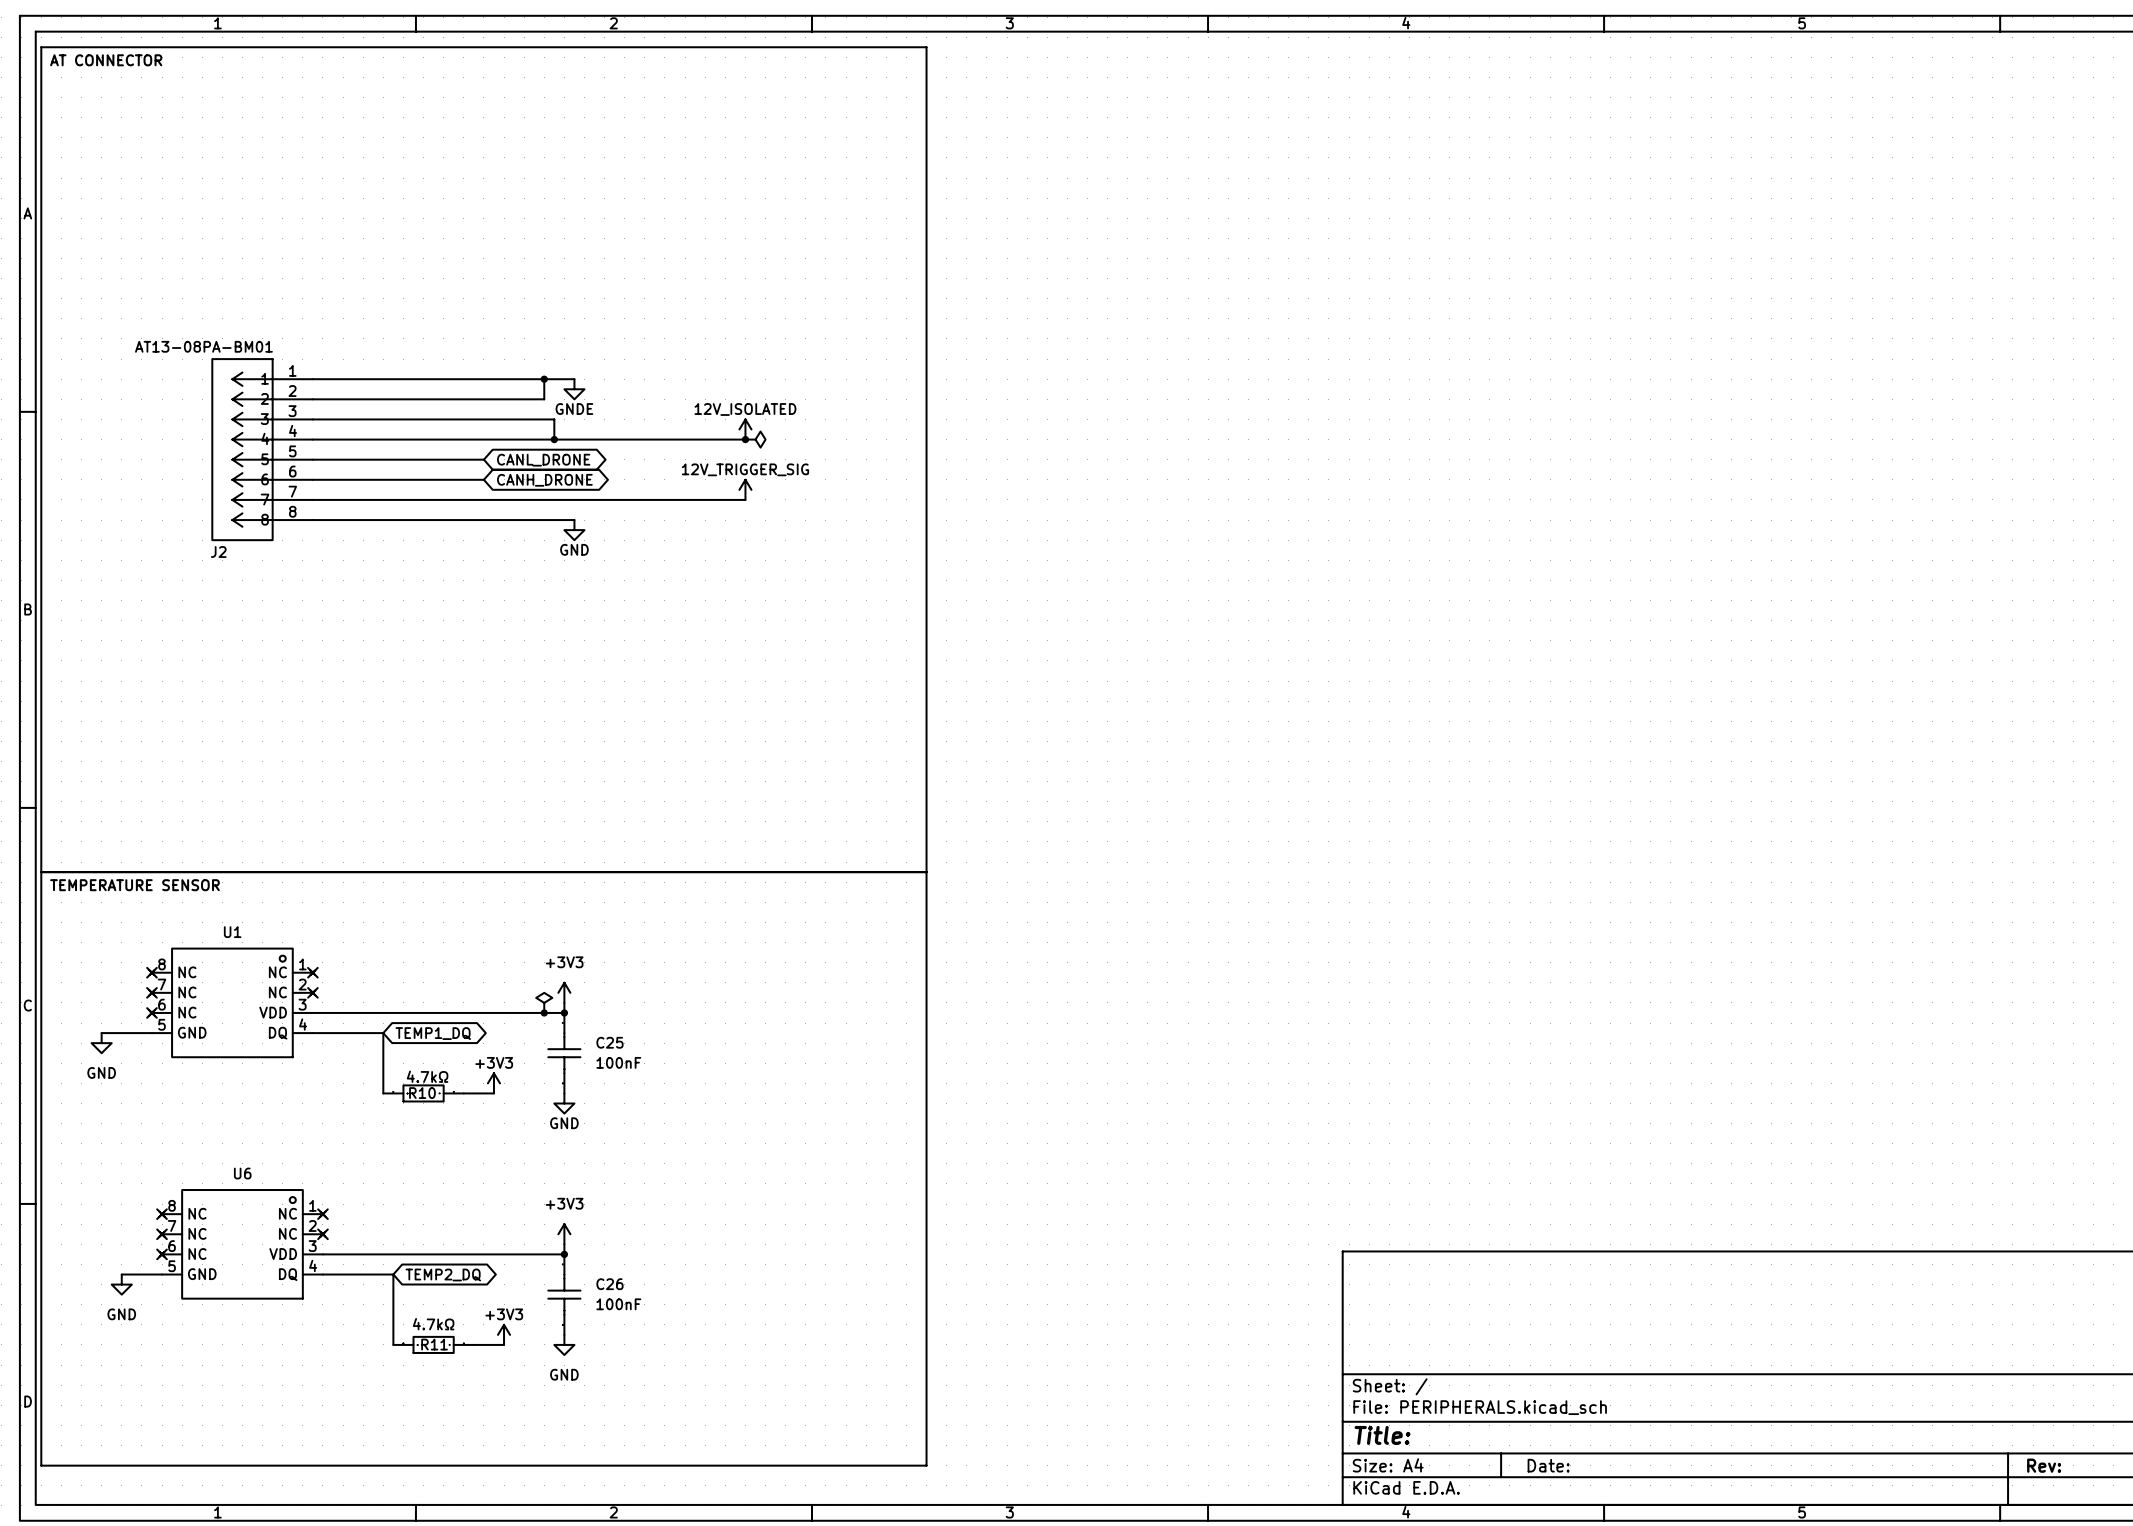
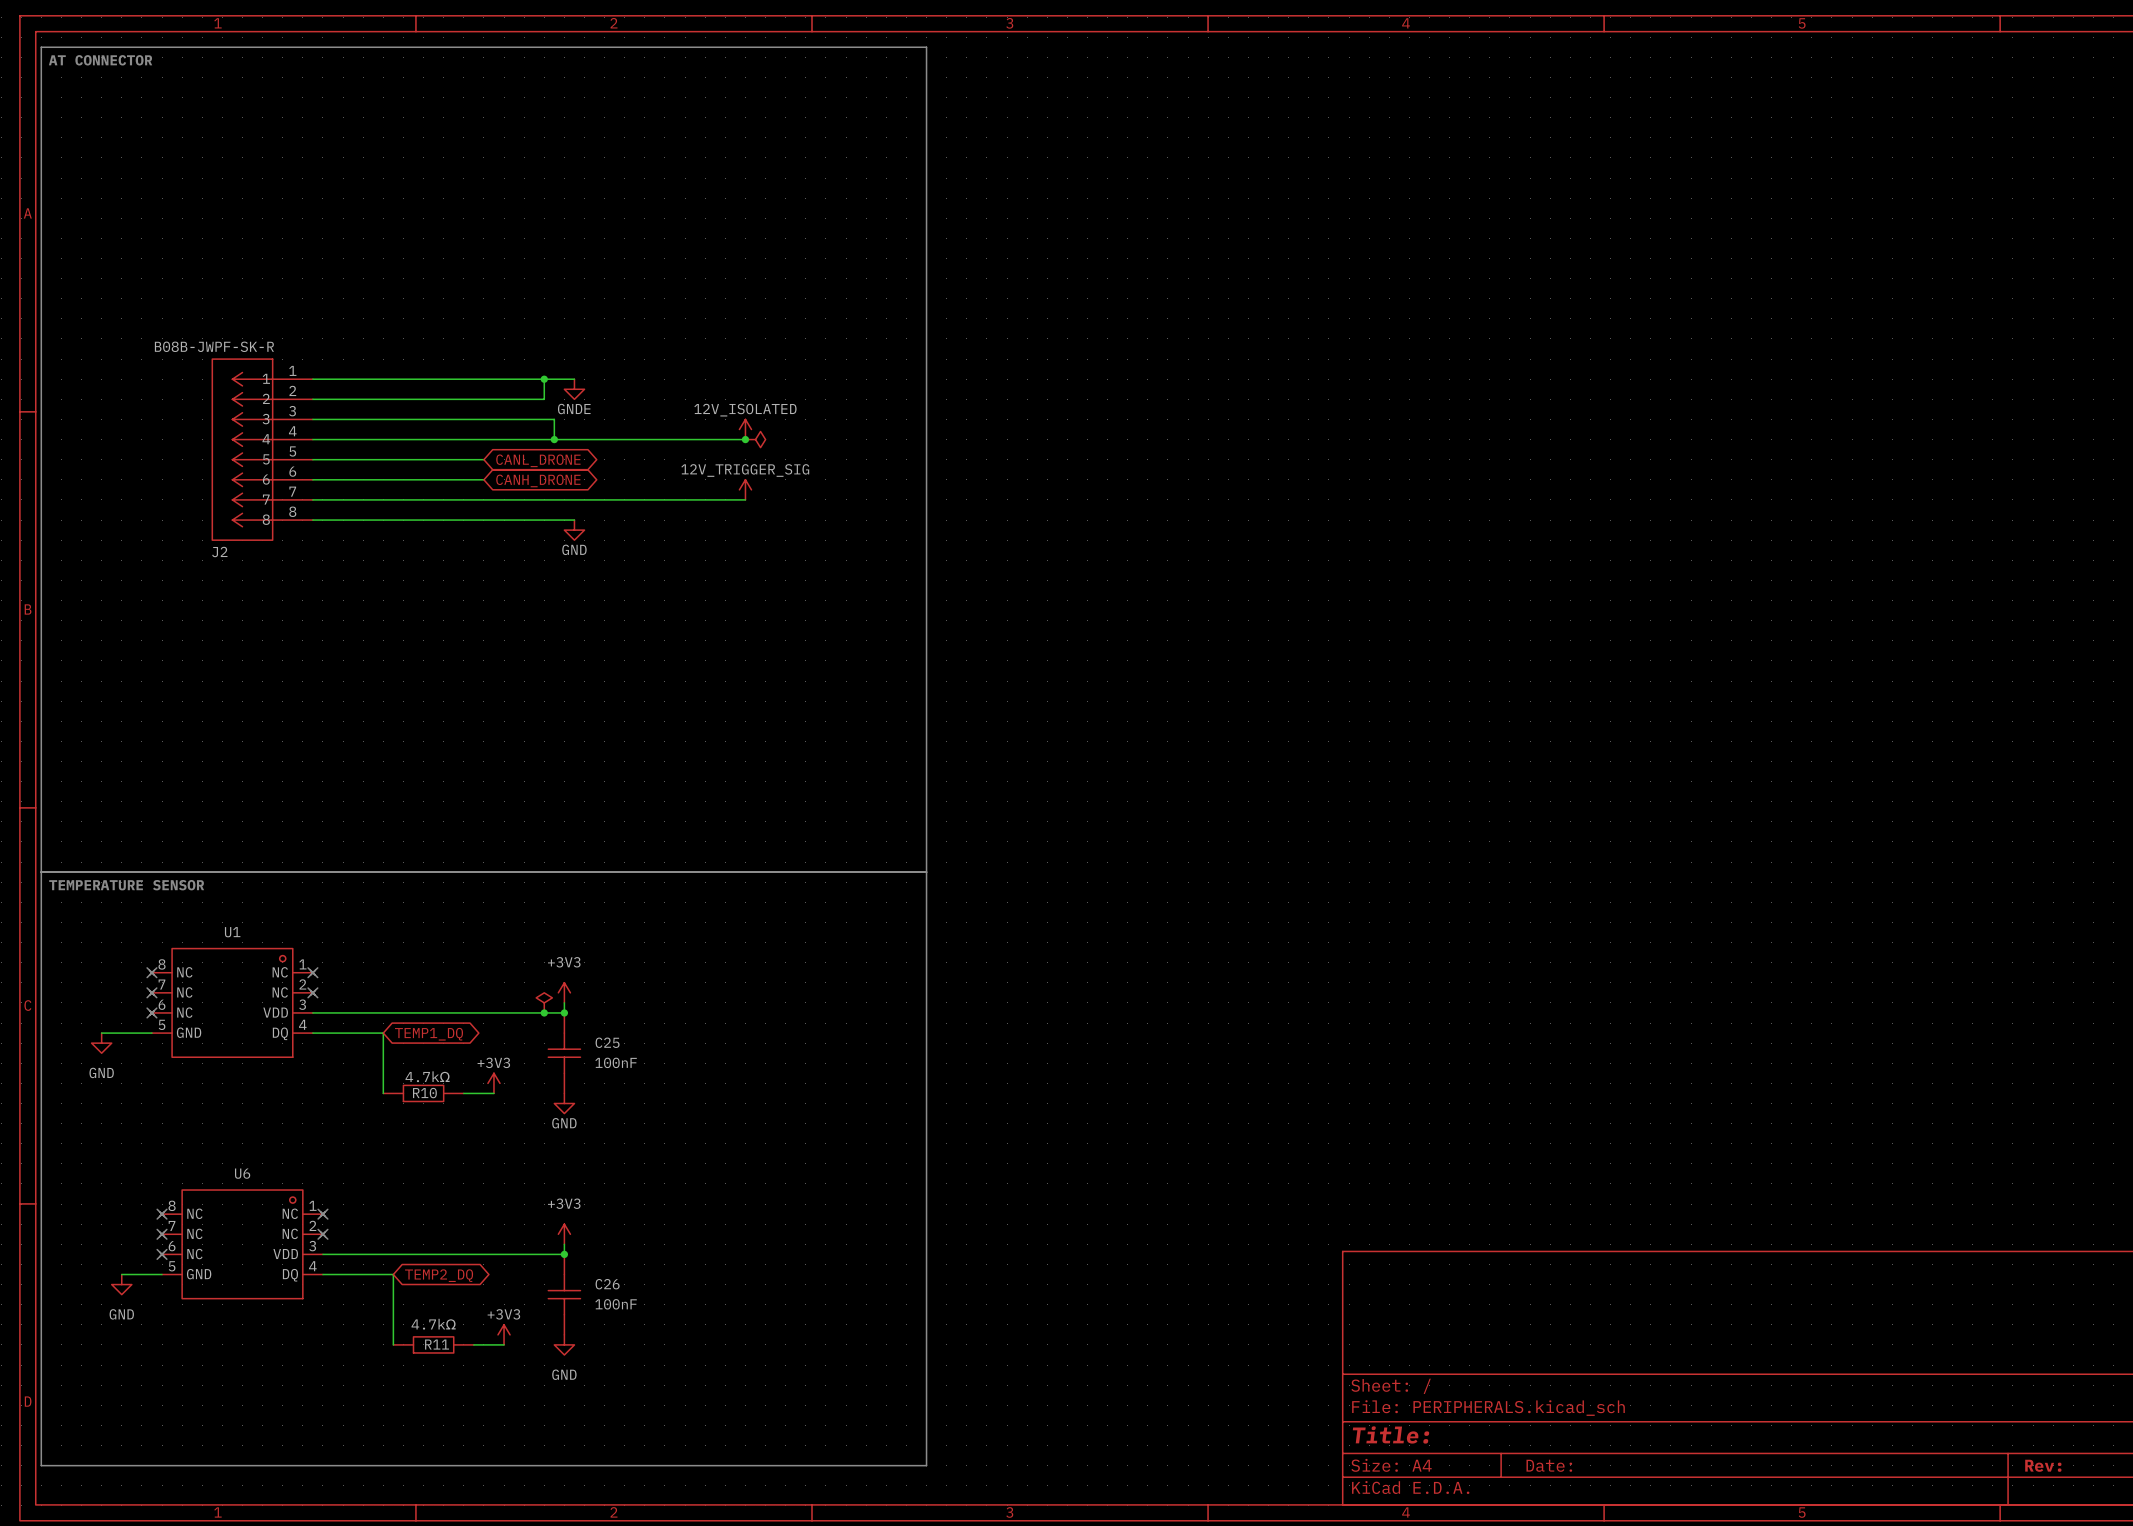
J2 value: AT13-08PA-BM01 (203, 346) -> B08B-JWPF-SK-R (214, 346)

